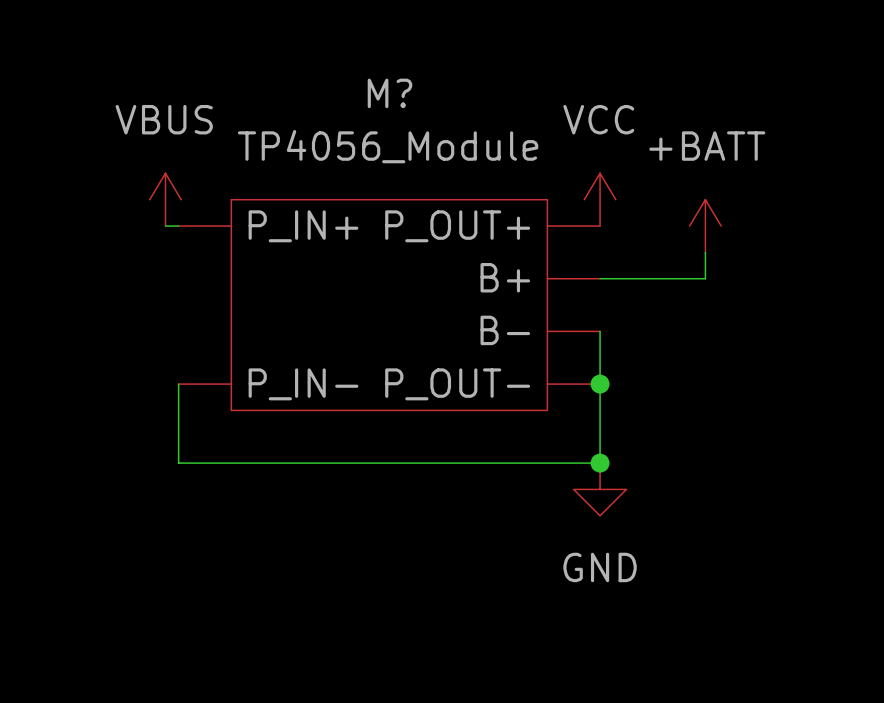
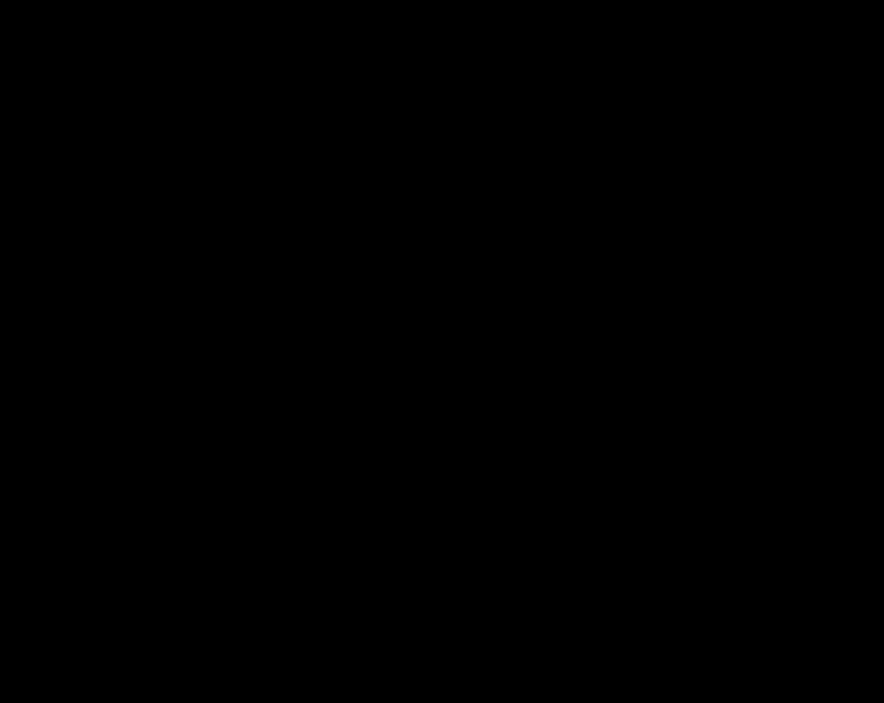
power symbol: VBUS (165, 199) -> none
power symbol: VCC (600, 199) -> none
wire: (165, 226) (178, 226) -> none
power symbol: +BATT (705, 226) -> none
wire: (705, 252) (705, 278) (600, 278) -> none
M?: TP4056_Module (389, 305) -> none
wire: (600, 331) (600, 463) (178, 463) (178, 384) -> none
junction: (600, 384) -> none
junction: (600, 463) -> none
power symbol: GND (600, 489) -> none

